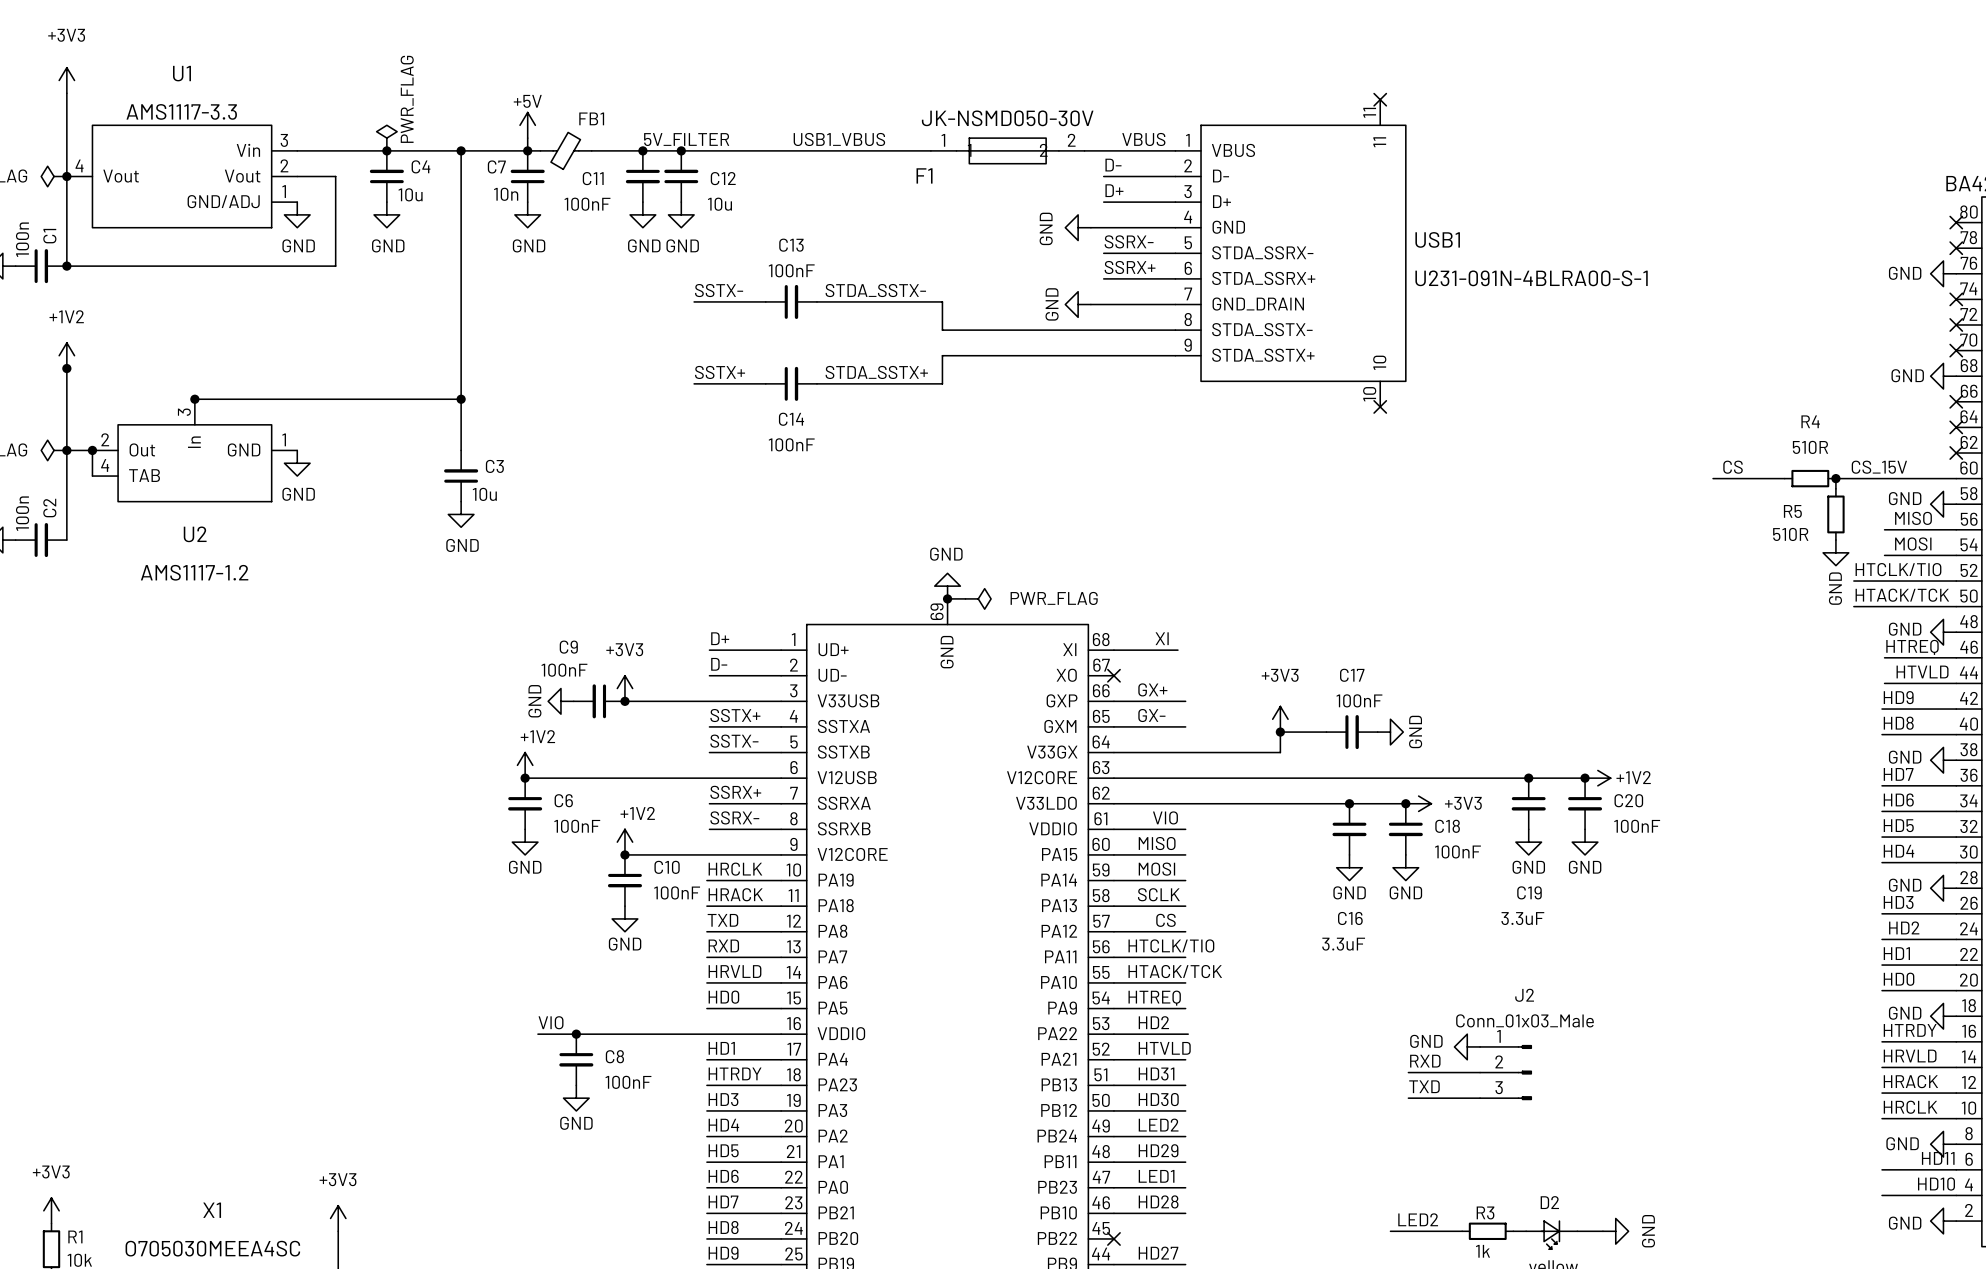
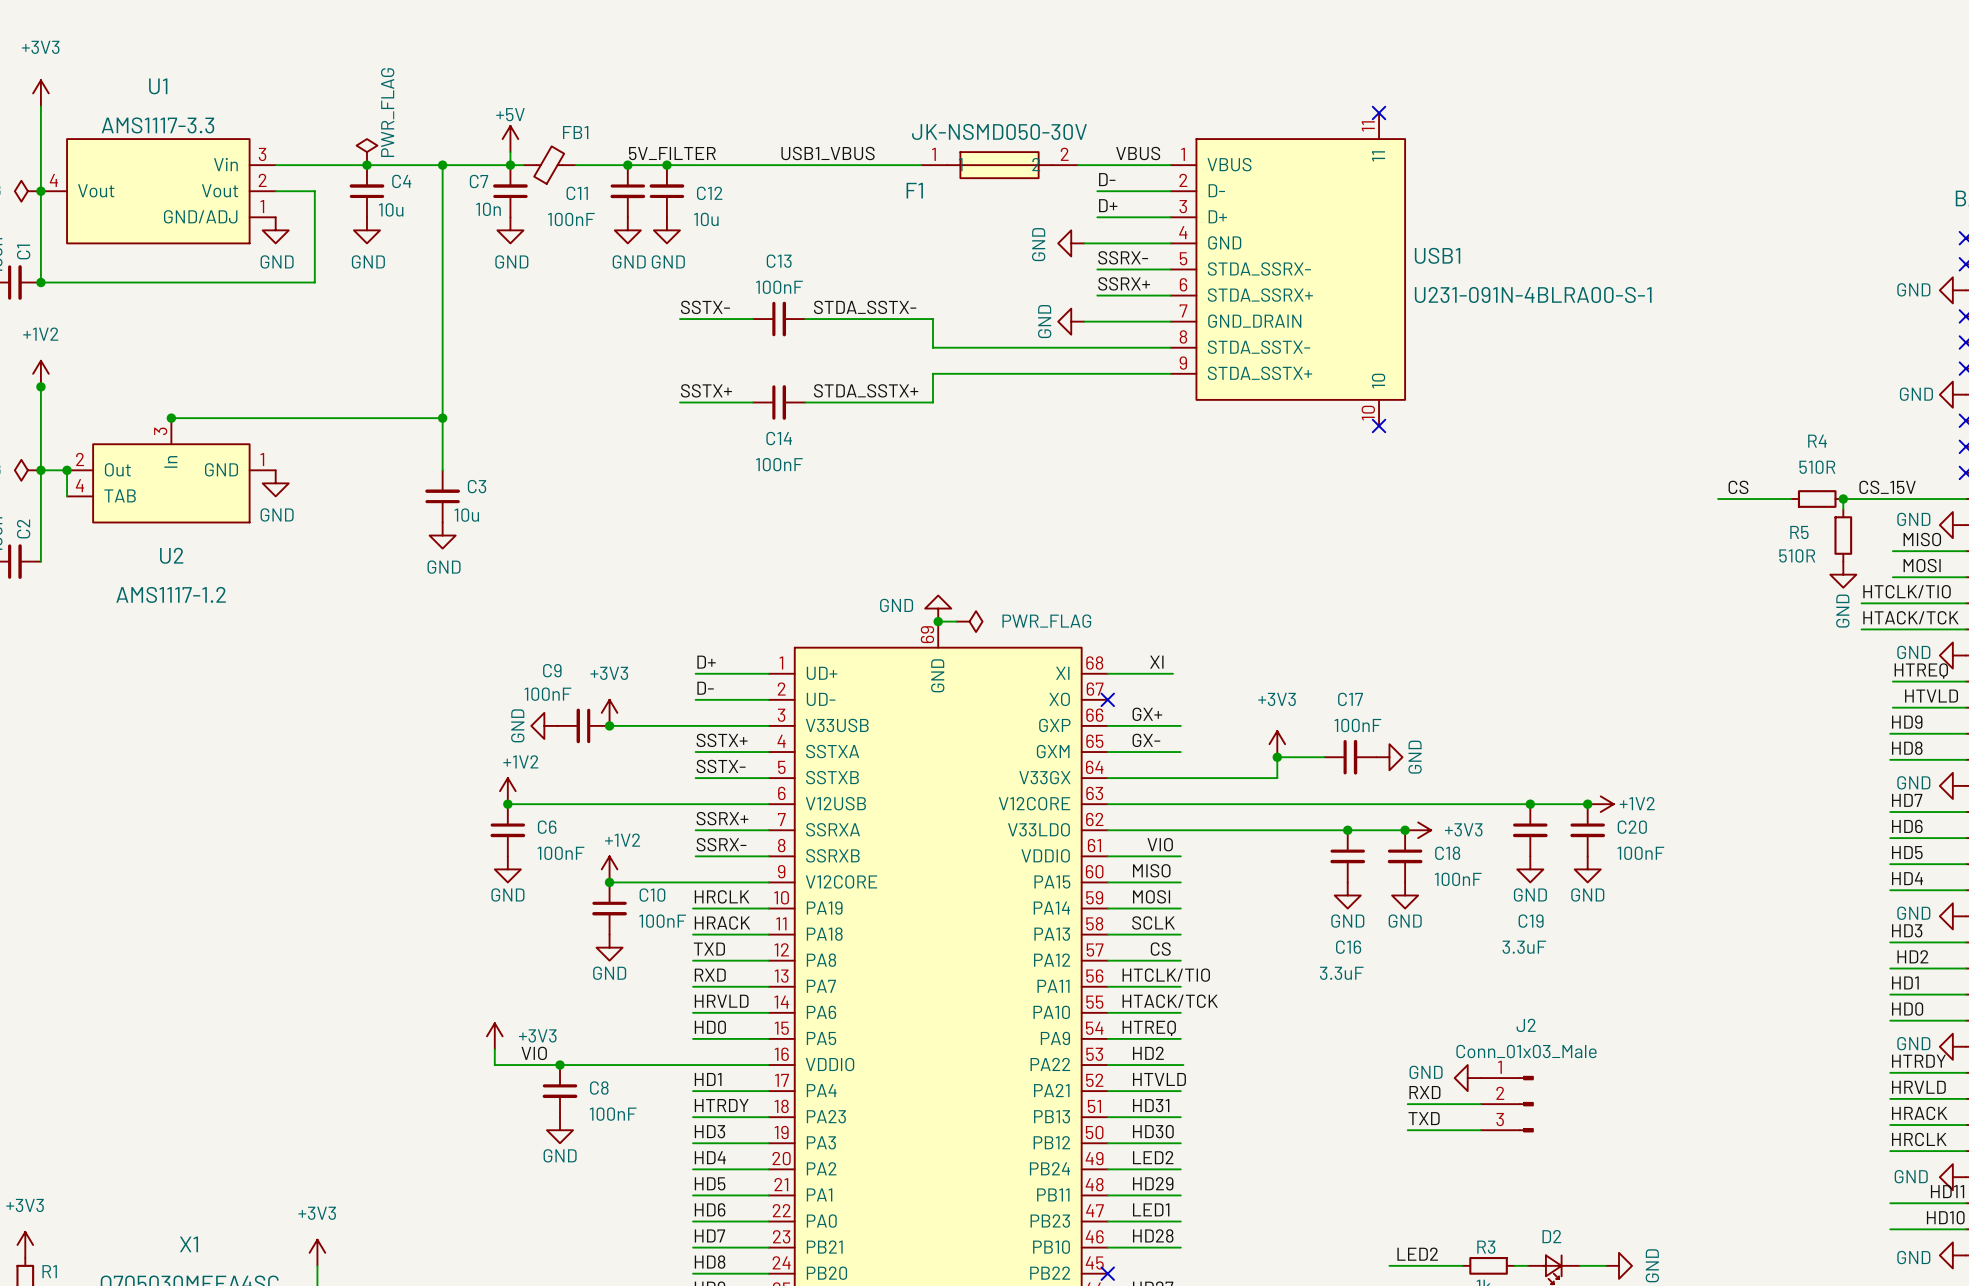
power symbol text position: GND (946, 554) -> GND (896, 605)
power symbol: none -> +3V3 (494, 1036)
wire: none -> (494, 1049) (494, 1065) (520, 1065)

